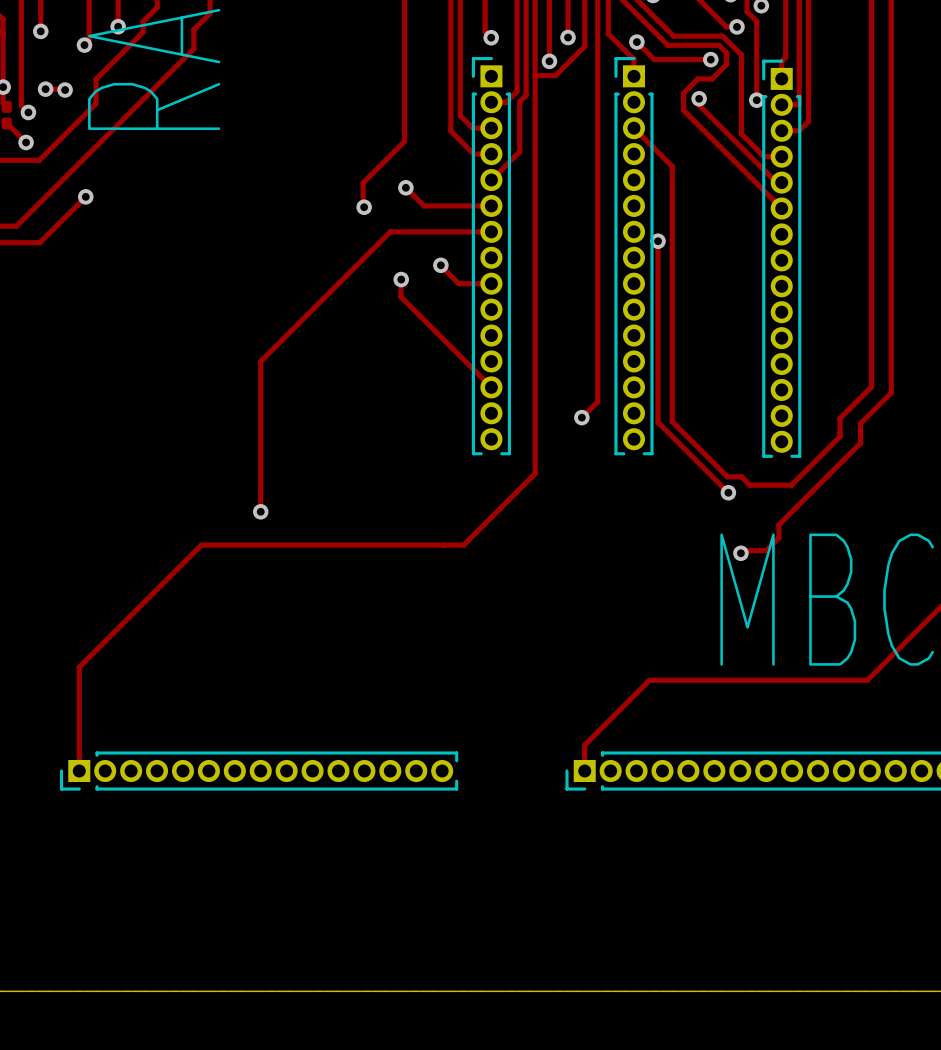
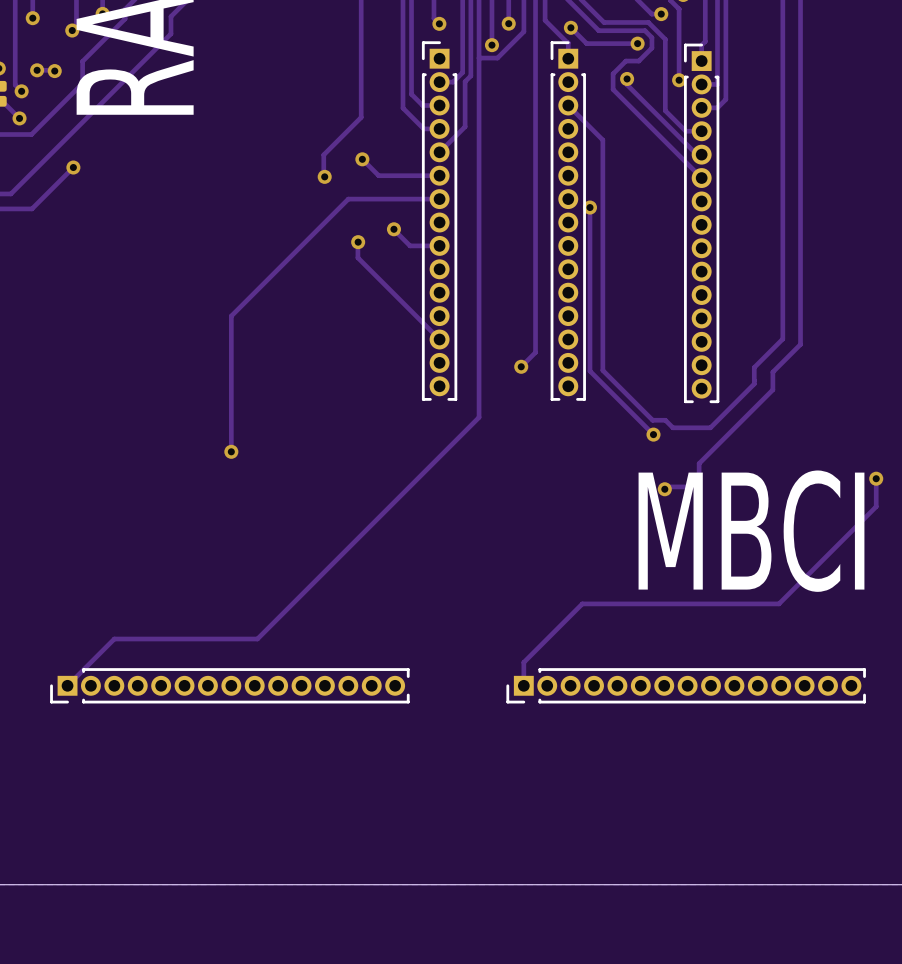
track: (463, 545) (201, 545) (79, 667) (79, 771) -> (414, 481) (257, 639) (114, 639) (67, 685)

